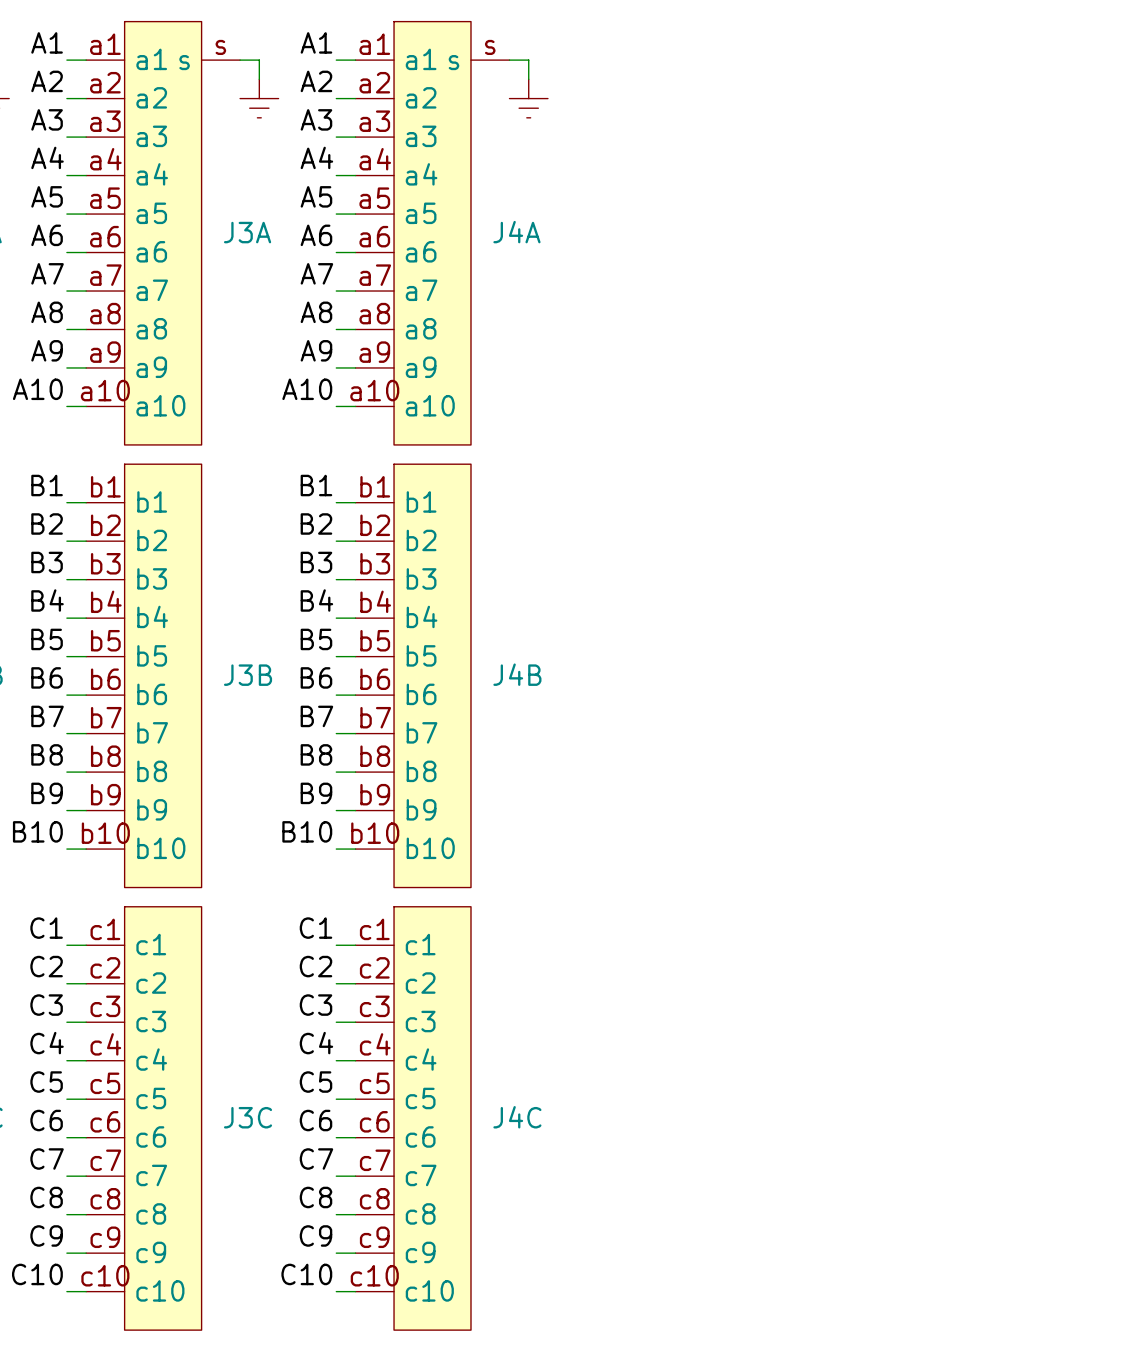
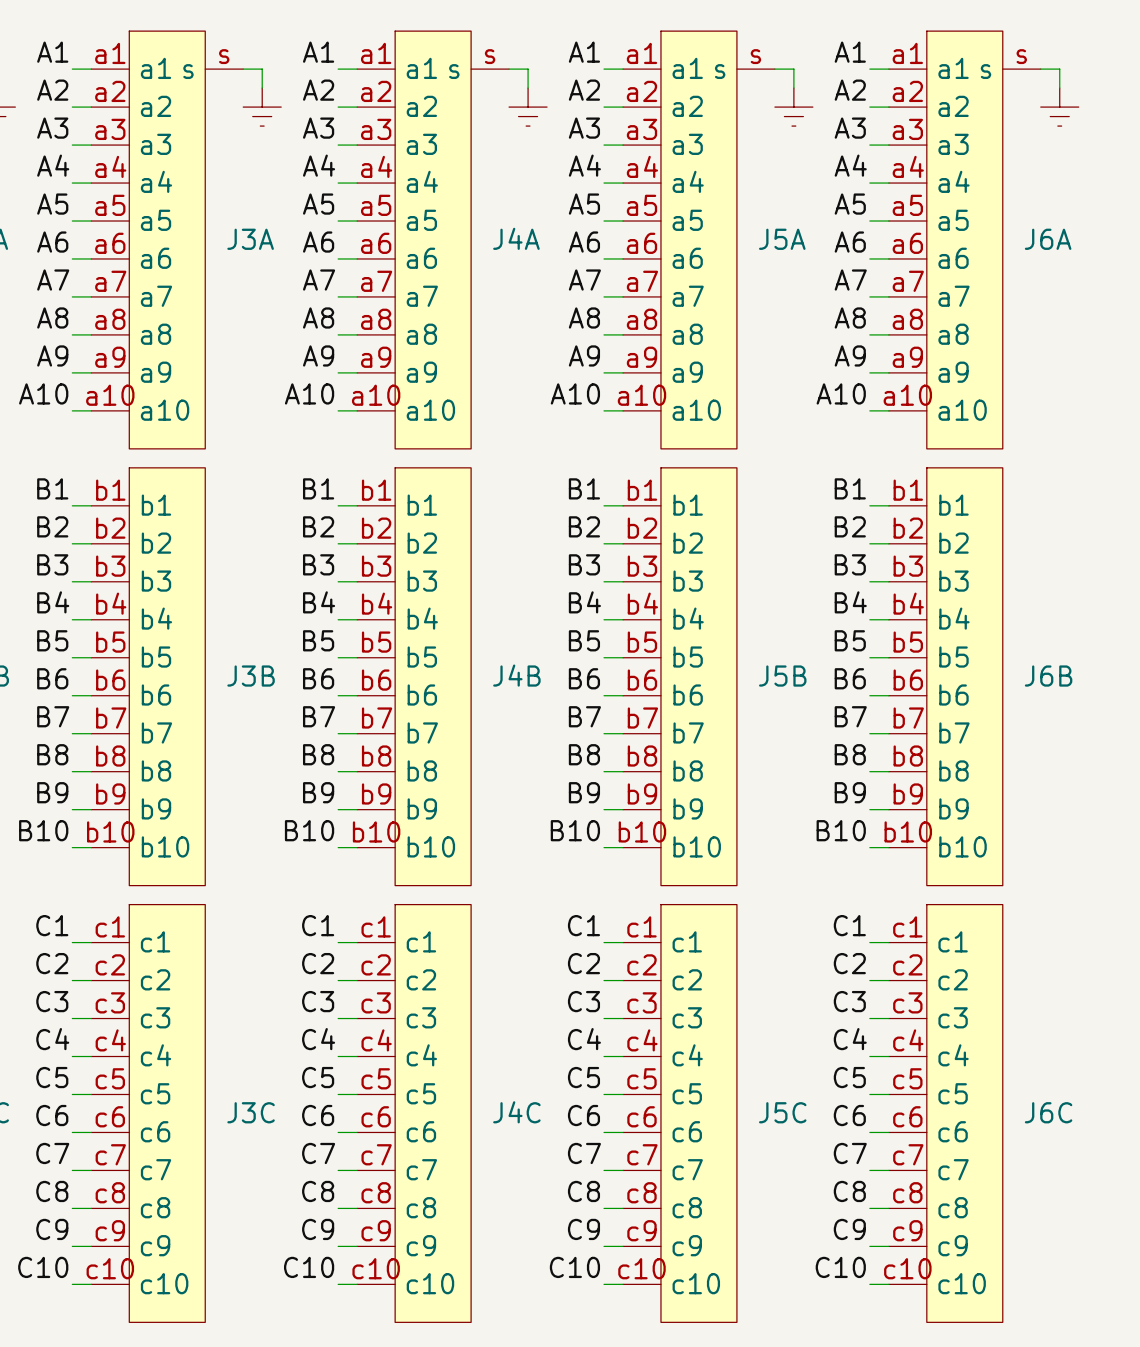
label: none -> A1 (584, 52)
label: none -> A1 (850, 52)
wire: none -> (604, 69) (623, 69)
wire: none -> (774, 69) (793, 69) (793, 88)
wire: none -> (869, 69) (888, 69)
wire: none -> (1040, 69) (1059, 69) (1059, 88)
label: none -> A2 (584, 90)
label: none -> A2 (850, 90)
wire: none -> (604, 107) (623, 107)
power symbol: none -> (793, 107)
wire: none -> (869, 107) (888, 107)
power symbol: none -> (1059, 107)
label: none -> A3 (584, 128)
label: none -> A3 (850, 128)
wire: none -> (604, 145) (623, 145)
wire: none -> (869, 145) (888, 145)
label: none -> A4 (584, 165)
label: none -> A4 (850, 165)
wire: none -> (604, 183) (623, 183)
wire: none -> (869, 183) (888, 183)
label: none -> A5 (584, 204)
label: none -> A5 (850, 204)
wire: none -> (604, 221) (623, 221)
wire: none -> (869, 221) (888, 221)
J5A: none -> (698, 239)
J6A: none -> (964, 239)
label: none -> A6 (584, 242)
label: none -> A6 (850, 242)
wire: none -> (604, 258) (623, 258)
wire: none -> (869, 258) (888, 258)
label: none -> A7 (584, 280)
label: none -> A7 (850, 280)
wire: none -> (604, 296) (623, 296)
wire: none -> (869, 296) (888, 296)
label: none -> A8 (584, 317)
label: none -> A8 (850, 317)
wire: none -> (604, 334) (623, 334)
wire: none -> (869, 334) (888, 334)
label: none -> A9 (584, 355)
label: none -> A9 (850, 355)
wire: none -> (604, 372) (623, 372)
wire: none -> (869, 372) (888, 372)
label: none -> A10 (575, 393)
label: none -> A10 (841, 393)
wire: none -> (604, 410) (623, 410)
wire: none -> (869, 410) (888, 410)
label: none -> B1 (584, 488)
label: none -> B1 (850, 488)
wire: none -> (604, 505) (623, 505)
wire: none -> (869, 505) (888, 505)
label: none -> B2 (584, 526)
label: none -> B2 (850, 526)
wire: none -> (604, 543) (623, 543)
wire: none -> (869, 543) (888, 543)
label: none -> B3 (584, 564)
label: none -> B3 (850, 564)
wire: none -> (604, 581) (623, 581)
wire: none -> (869, 581) (888, 581)
label: none -> B4 (584, 602)
label: none -> B4 (850, 602)
wire: none -> (604, 619) (623, 619)
wire: none -> (869, 619) (888, 619)
label: none -> B5 (584, 640)
label: none -> B5 (850, 640)
wire: none -> (604, 657) (623, 657)
wire: none -> (869, 657) (888, 657)
J5B: none -> (679, 676)
J6B: none -> (945, 676)
label: none -> B6 (584, 678)
label: none -> B6 (850, 678)
wire: none -> (604, 695) (623, 695)
wire: none -> (869, 695) (888, 695)
label: none -> B7 (584, 716)
label: none -> B7 (850, 716)
wire: none -> (604, 733) (623, 733)
wire: none -> (869, 733) (888, 733)
label: none -> B8 (584, 754)
label: none -> B8 (850, 754)
wire: none -> (604, 771) (623, 771)
wire: none -> (869, 771) (888, 771)
label: none -> B9 (584, 792)
label: none -> B9 (850, 792)
wire: none -> (604, 809) (623, 809)
wire: none -> (869, 809) (888, 809)
label: none -> B10 (575, 830)
label: none -> B10 (841, 830)
wire: none -> (604, 847) (623, 847)
wire: none -> (869, 847) (888, 847)
label: none -> C1 (583, 925)
label: none -> C1 (849, 925)
wire: none -> (604, 942) (623, 942)
wire: none -> (869, 942) (888, 942)
label: none -> C2 (583, 963)
label: none -> C2 (849, 963)
wire: none -> (604, 980) (623, 980)
wire: none -> (869, 980) (888, 980)
label: none -> C3 (583, 1001)
label: none -> C3 (849, 1001)
wire: none -> (604, 1018) (623, 1018)
wire: none -> (869, 1018) (888, 1018)
label: none -> C4 (584, 1039)
label: none -> C4 (850, 1039)
wire: none -> (604, 1056) (623, 1056)
wire: none -> (869, 1056) (888, 1056)
label: none -> C5 (583, 1077)
label: none -> C5 (849, 1077)
wire: none -> (604, 1094) (623, 1094)
wire: none -> (869, 1094) (888, 1094)
J5C: none -> (679, 1113)
J6C: none -> (945, 1113)
label: none -> C6 (583, 1115)
label: none -> C6 (849, 1115)
wire: none -> (604, 1132) (623, 1132)
wire: none -> (869, 1132) (888, 1132)
label: none -> C7 (584, 1153)
label: none -> C7 (850, 1153)
wire: none -> (604, 1170) (623, 1170)
wire: none -> (869, 1170) (888, 1170)
label: none -> C8 (583, 1191)
label: none -> C8 (849, 1191)
wire: none -> (604, 1208) (623, 1208)
wire: none -> (869, 1208) (888, 1208)
label: none -> C9 (583, 1229)
label: none -> C9 (849, 1229)
wire: none -> (604, 1246) (623, 1246)
wire: none -> (869, 1246) (888, 1246)
label: none -> C10 (574, 1267)
label: none -> C10 (840, 1267)
wire: none -> (604, 1284) (623, 1284)
wire: none -> (869, 1284) (888, 1284)

